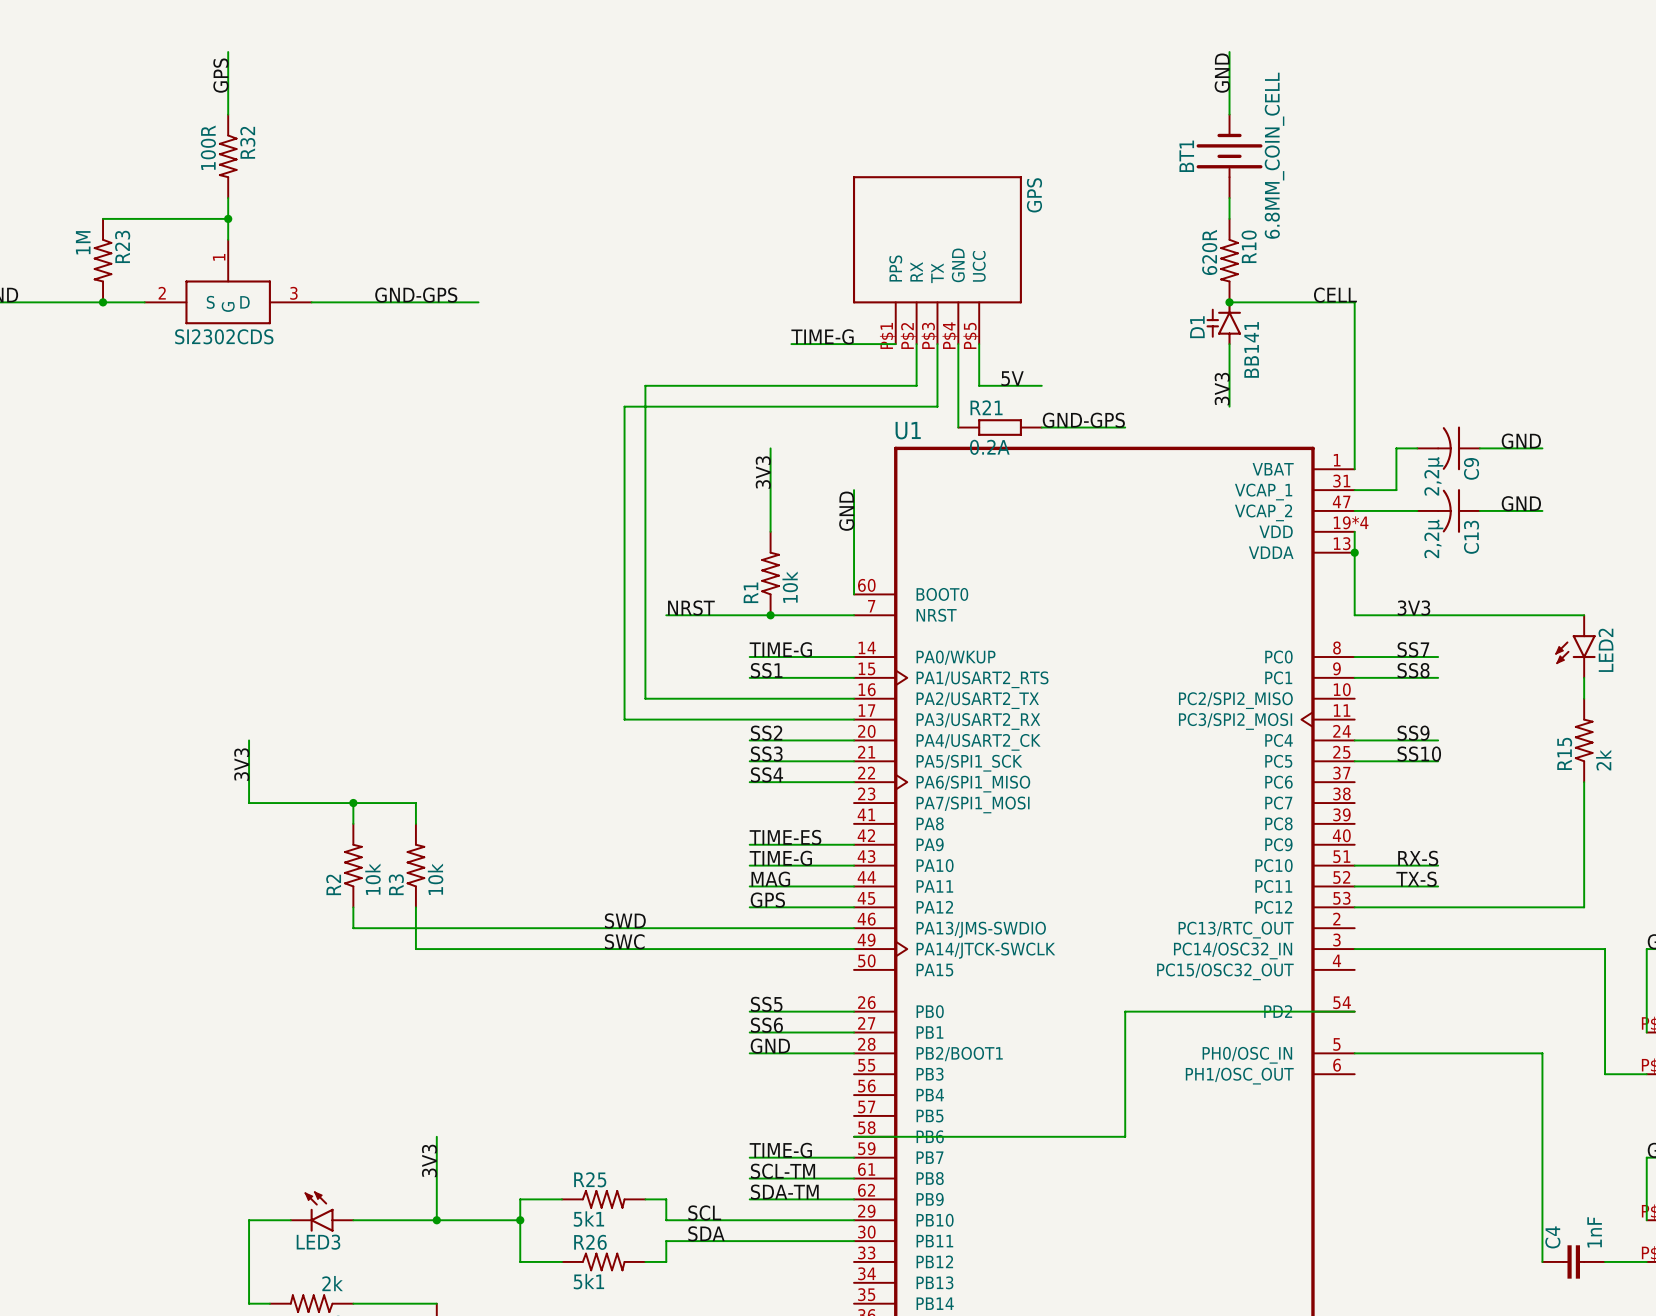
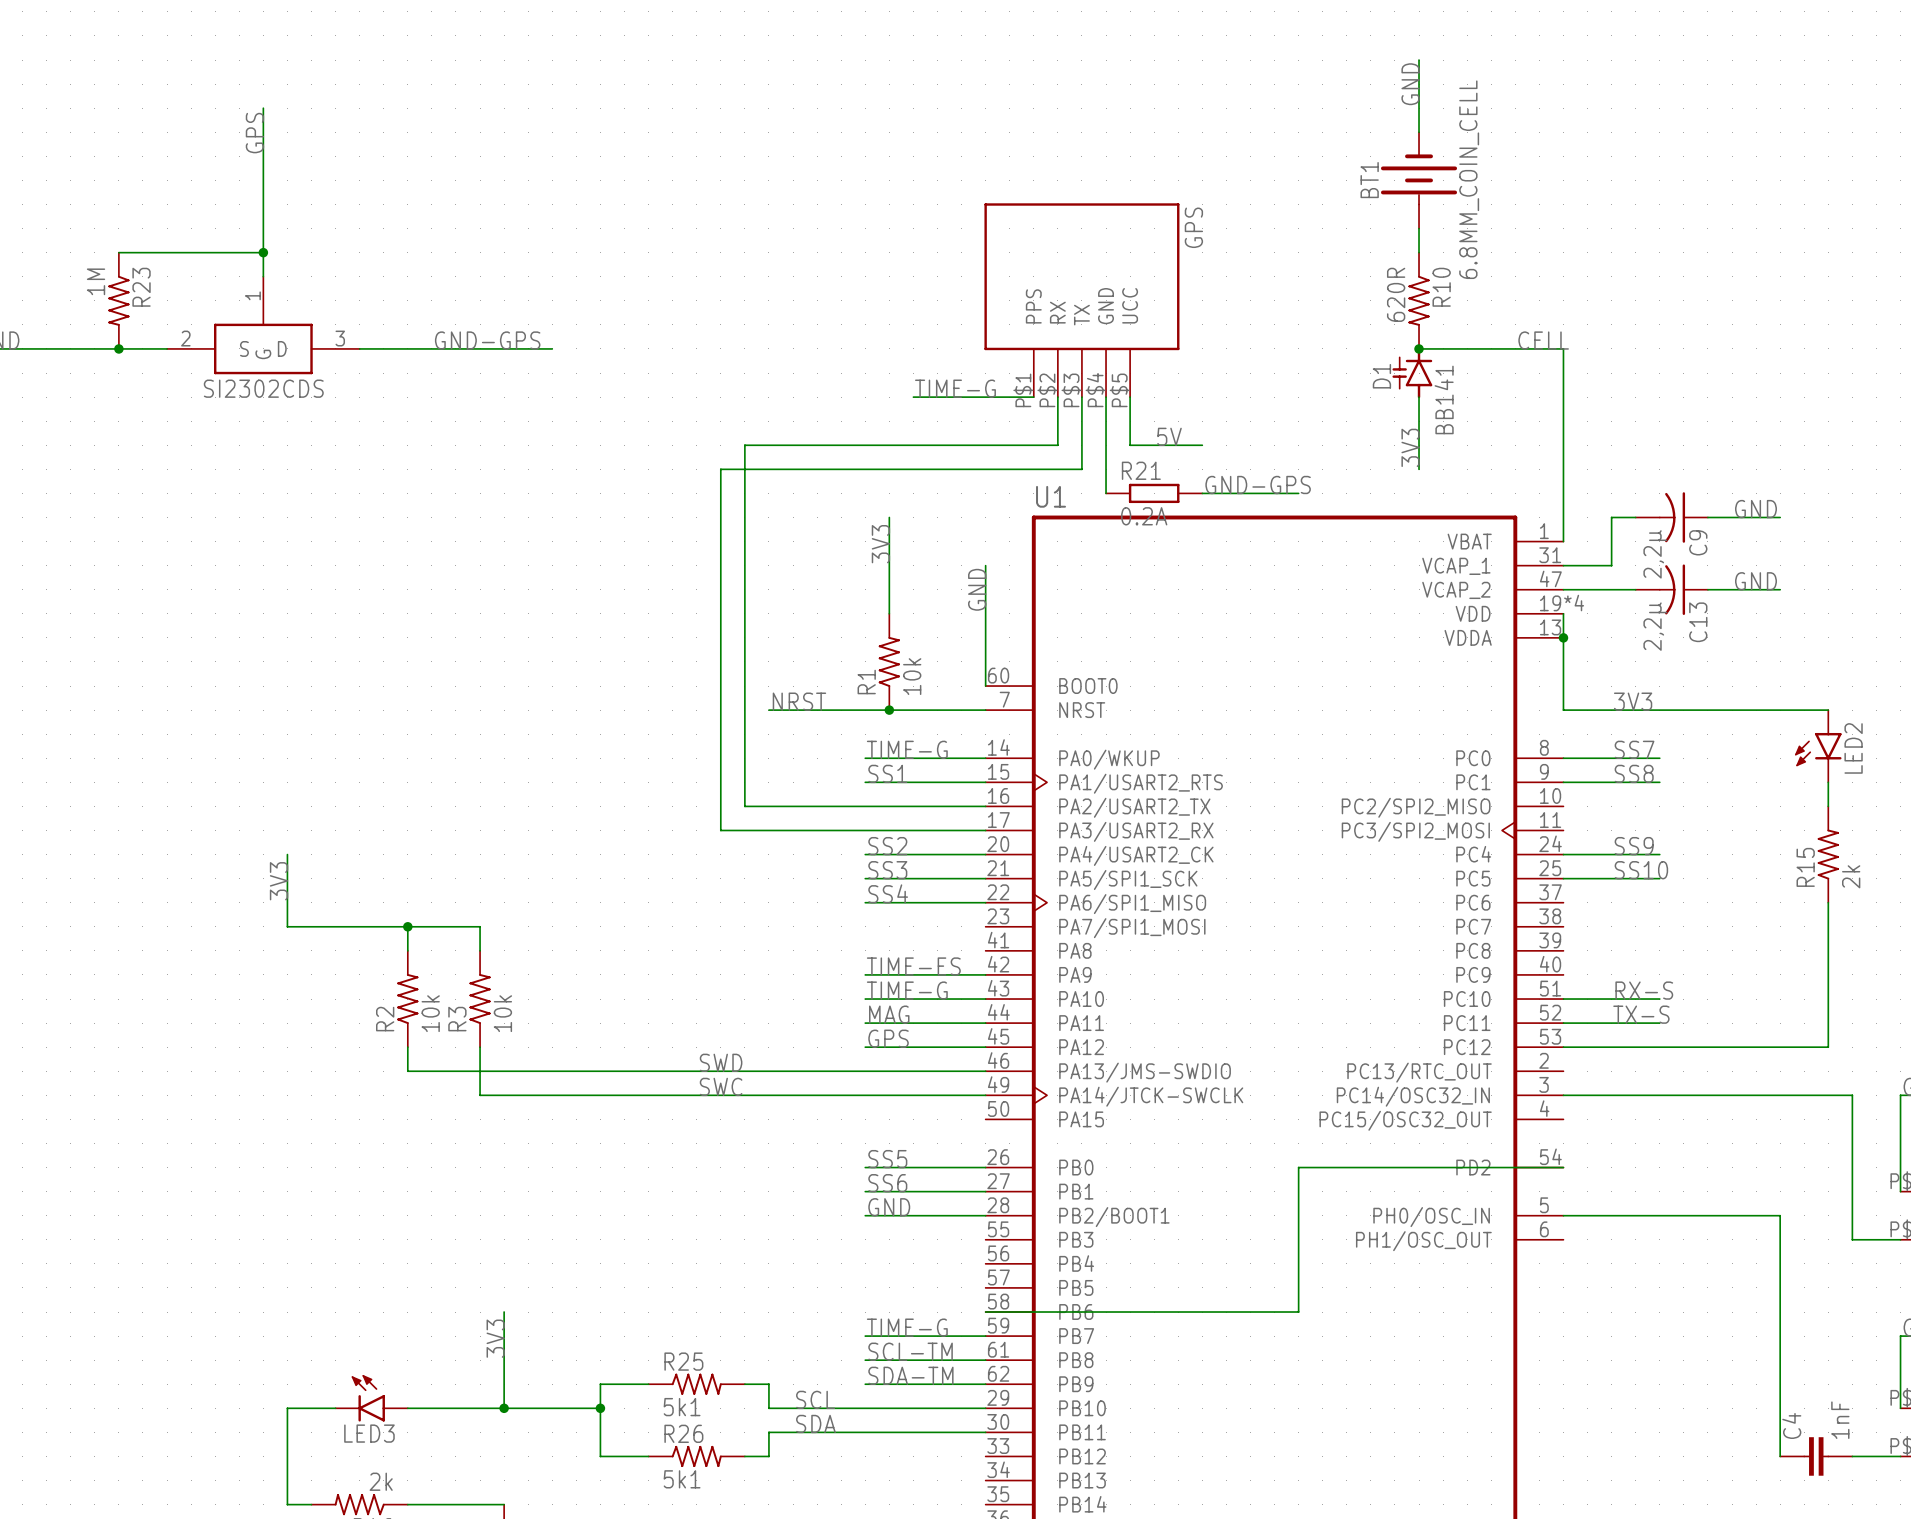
wire: (228, 52) (228, 93) -> none
label position: GPS (220, 75) -> GPS (254, 133)
R32: 100R (228, 156) -> none

